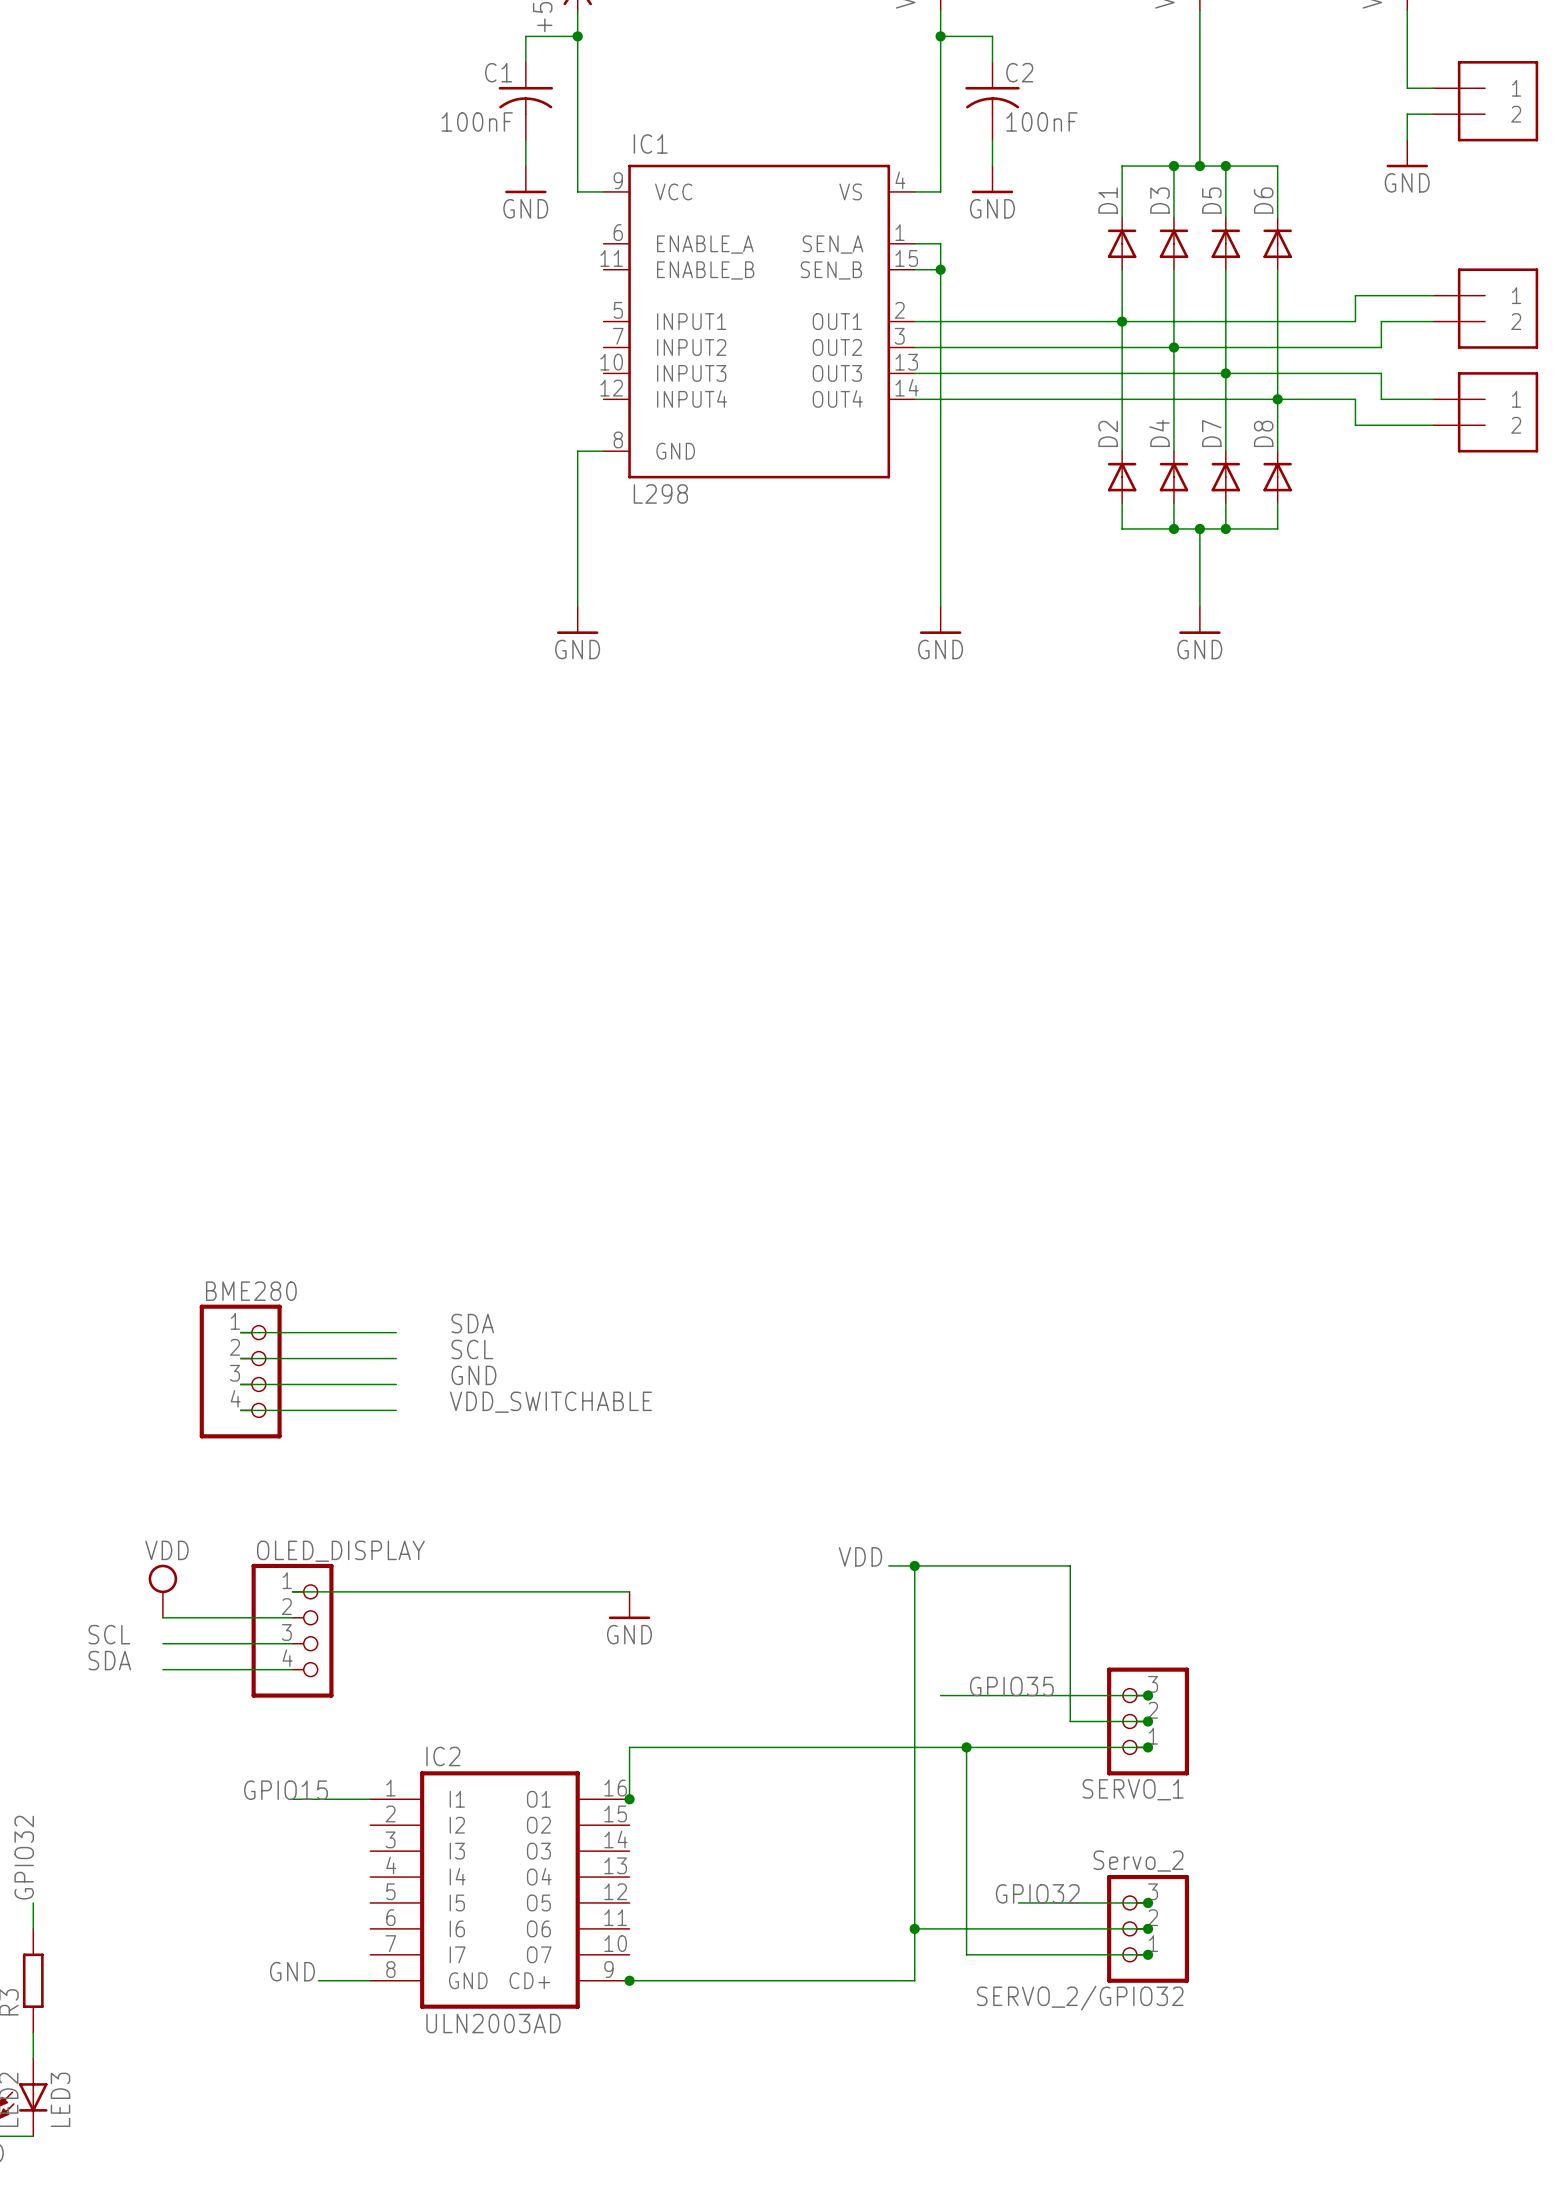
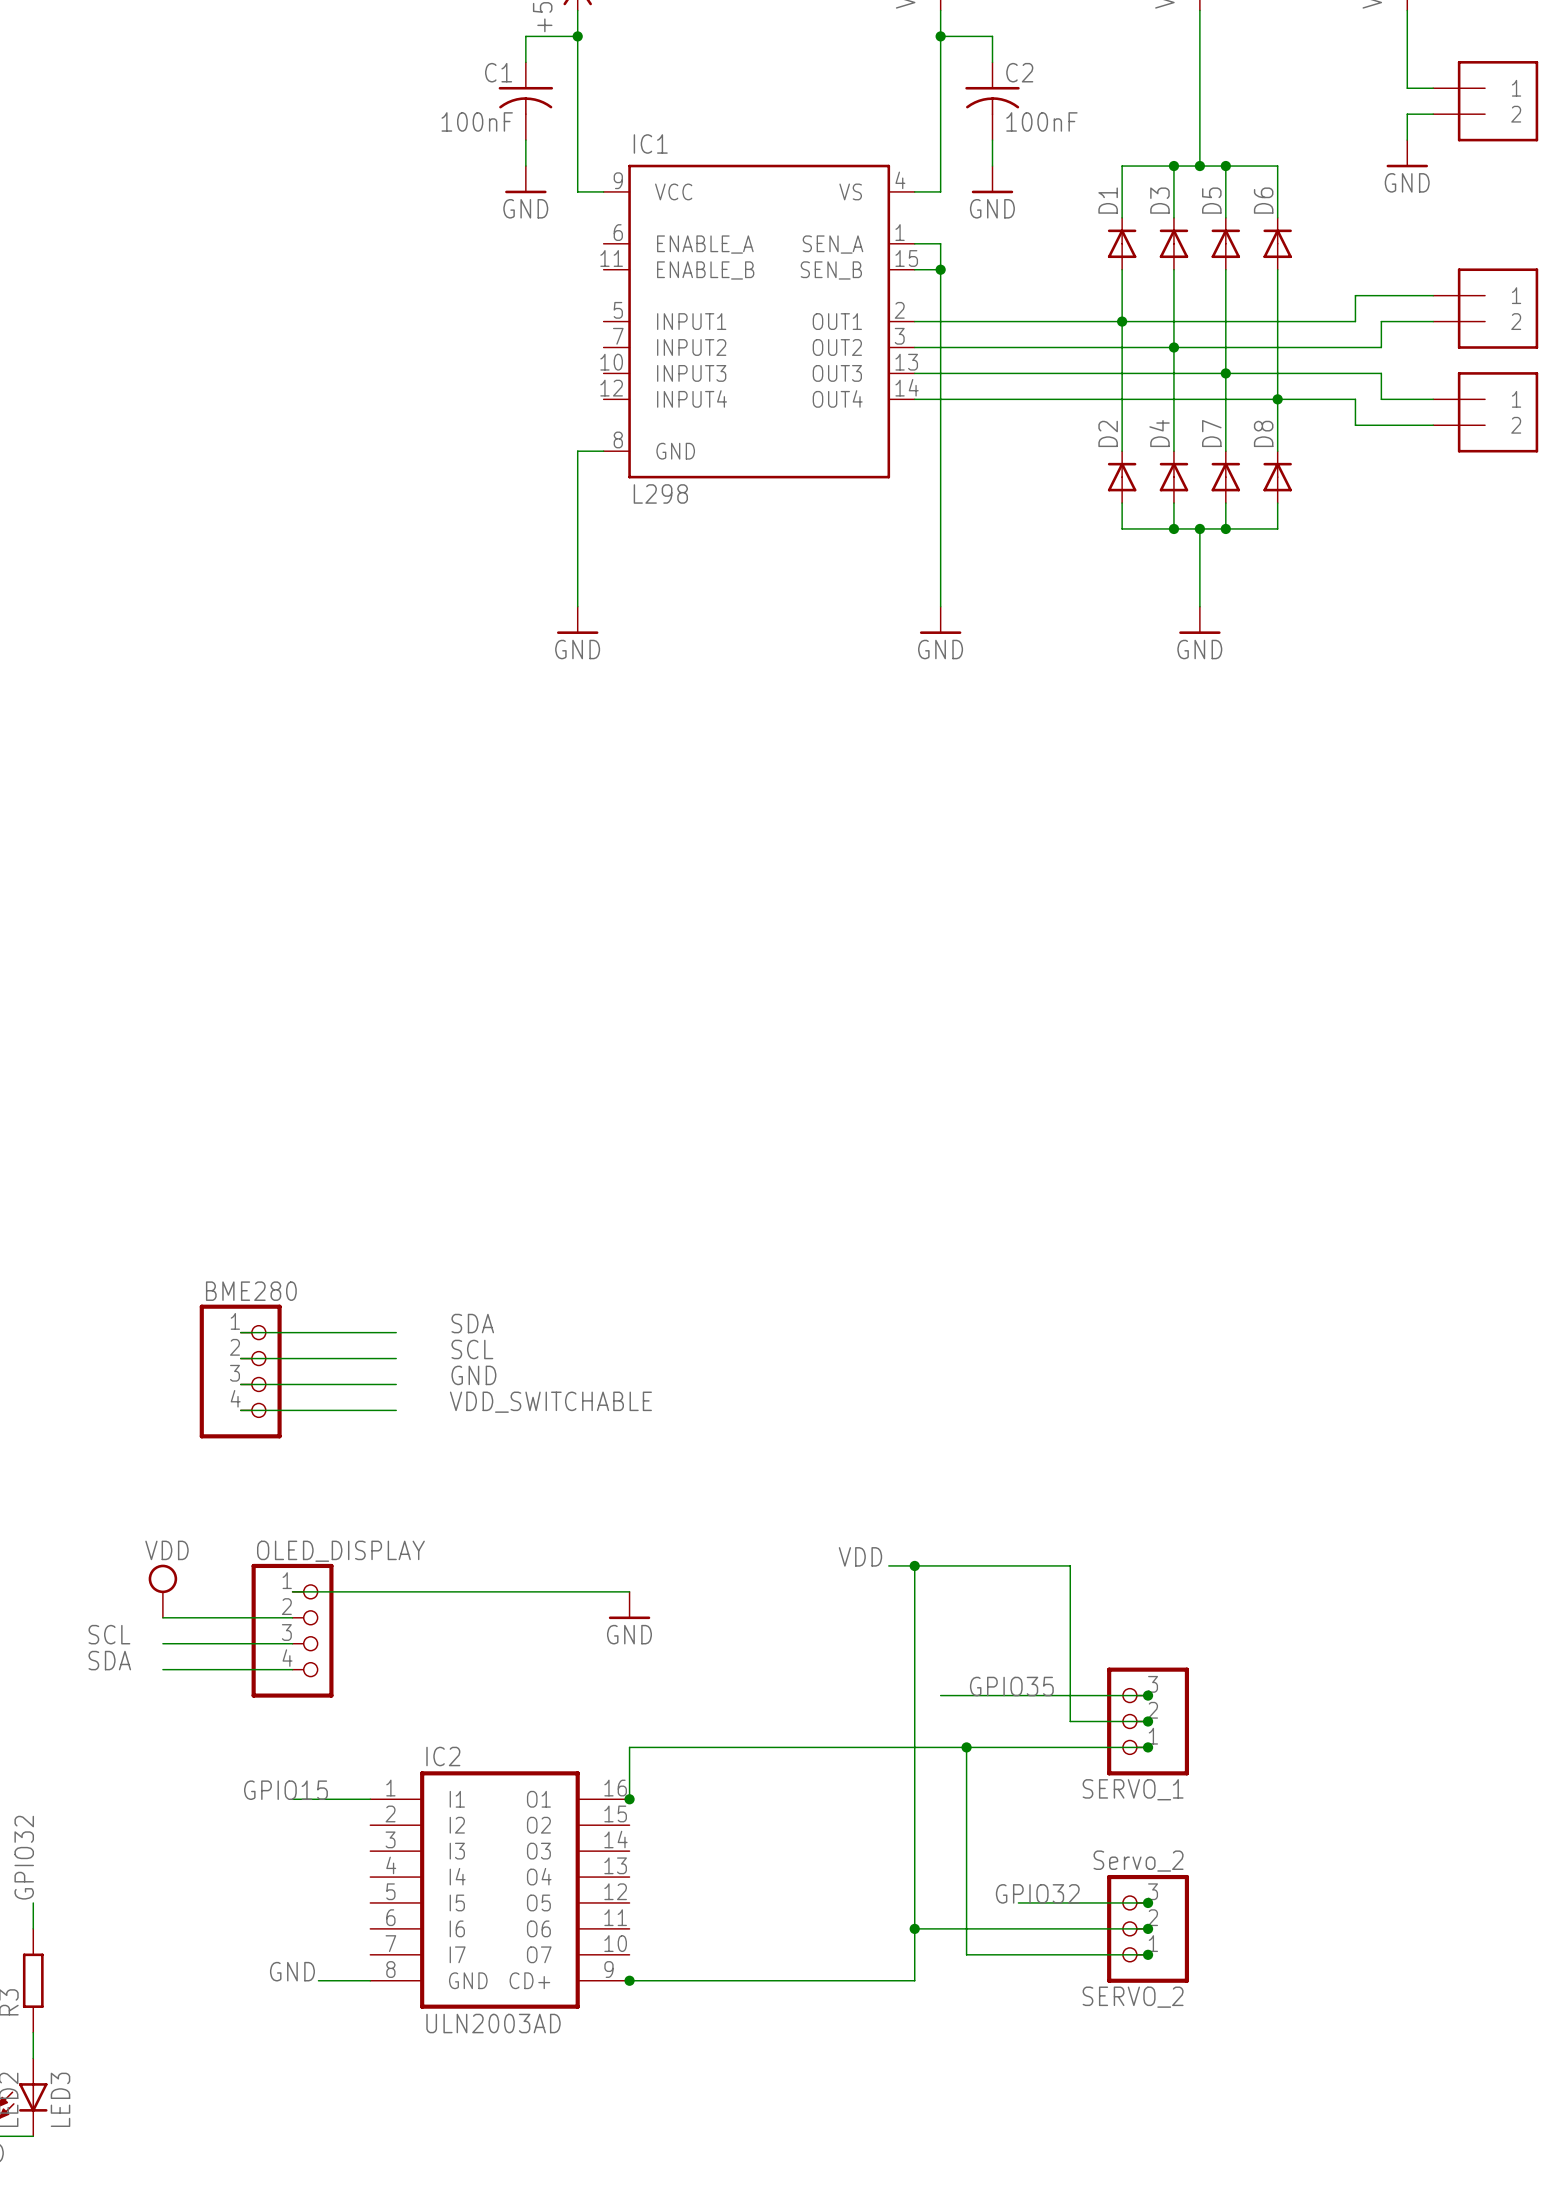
SERVO_2/GPIO32 name: SERVO_2/GPIO32 (1080, 1998) -> SERVO_2 (1133, 1997)

